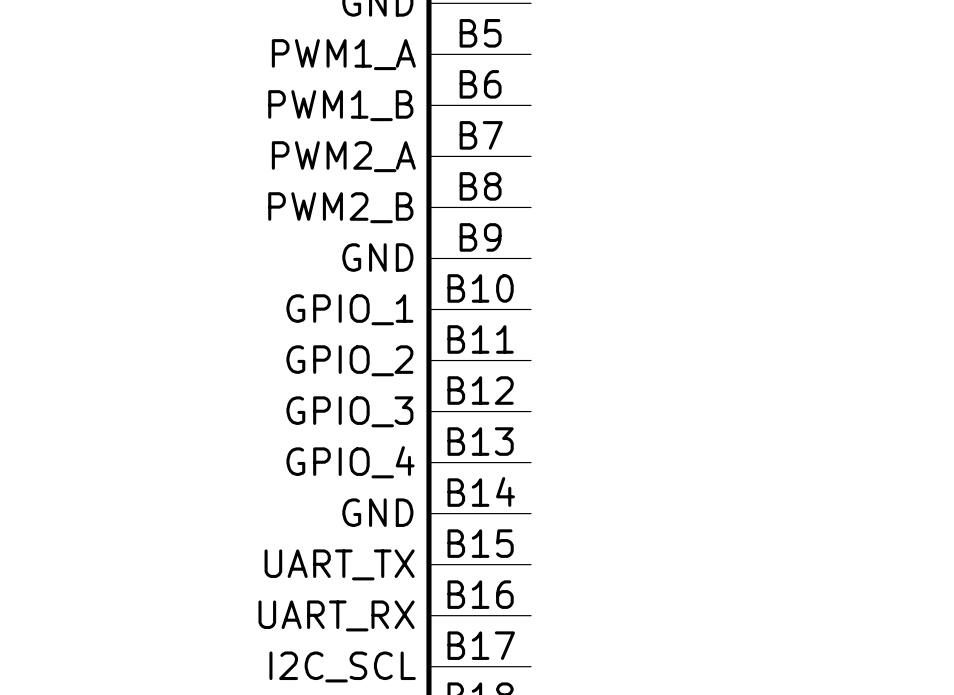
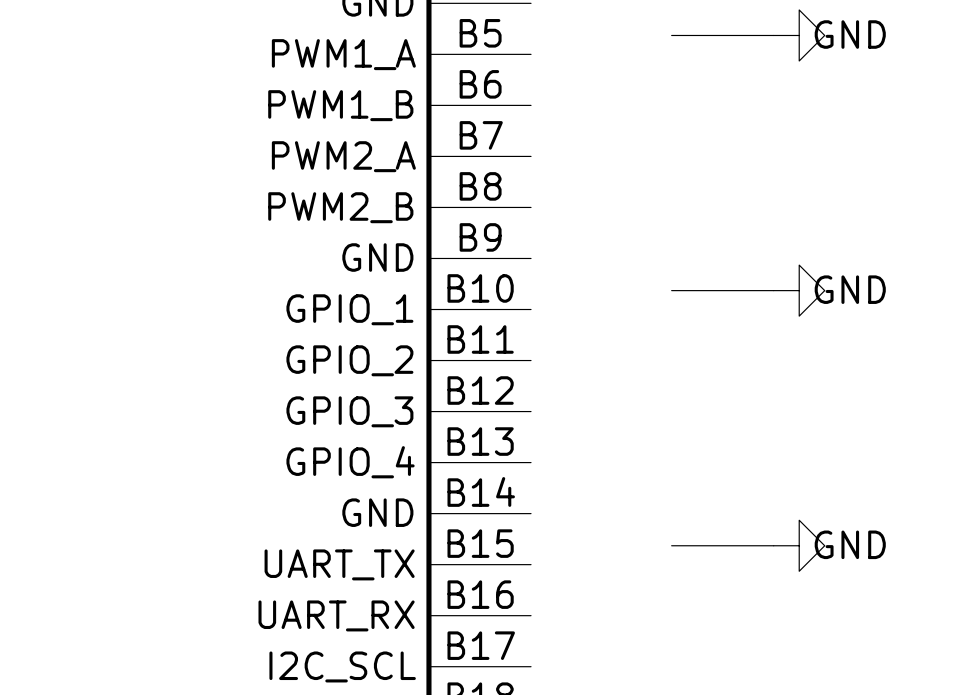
wire: none -> (671, 35) (773, 35)
power symbol: none -> GND (799, 35)
wire: none -> (671, 290) (773, 290)
power symbol: none -> GND (799, 290)
wire: none -> (671, 545) (773, 545)
power symbol: none -> GND (799, 545)

